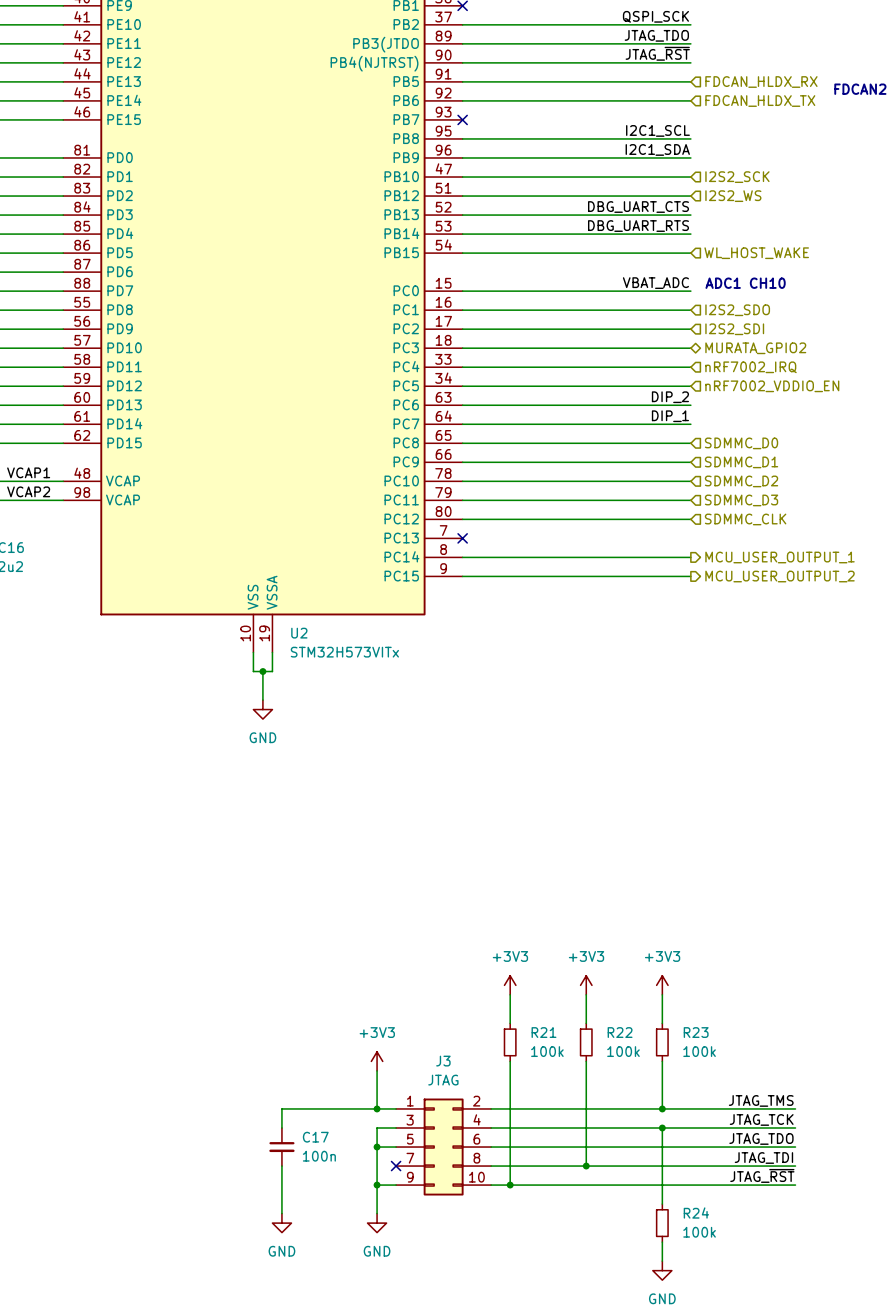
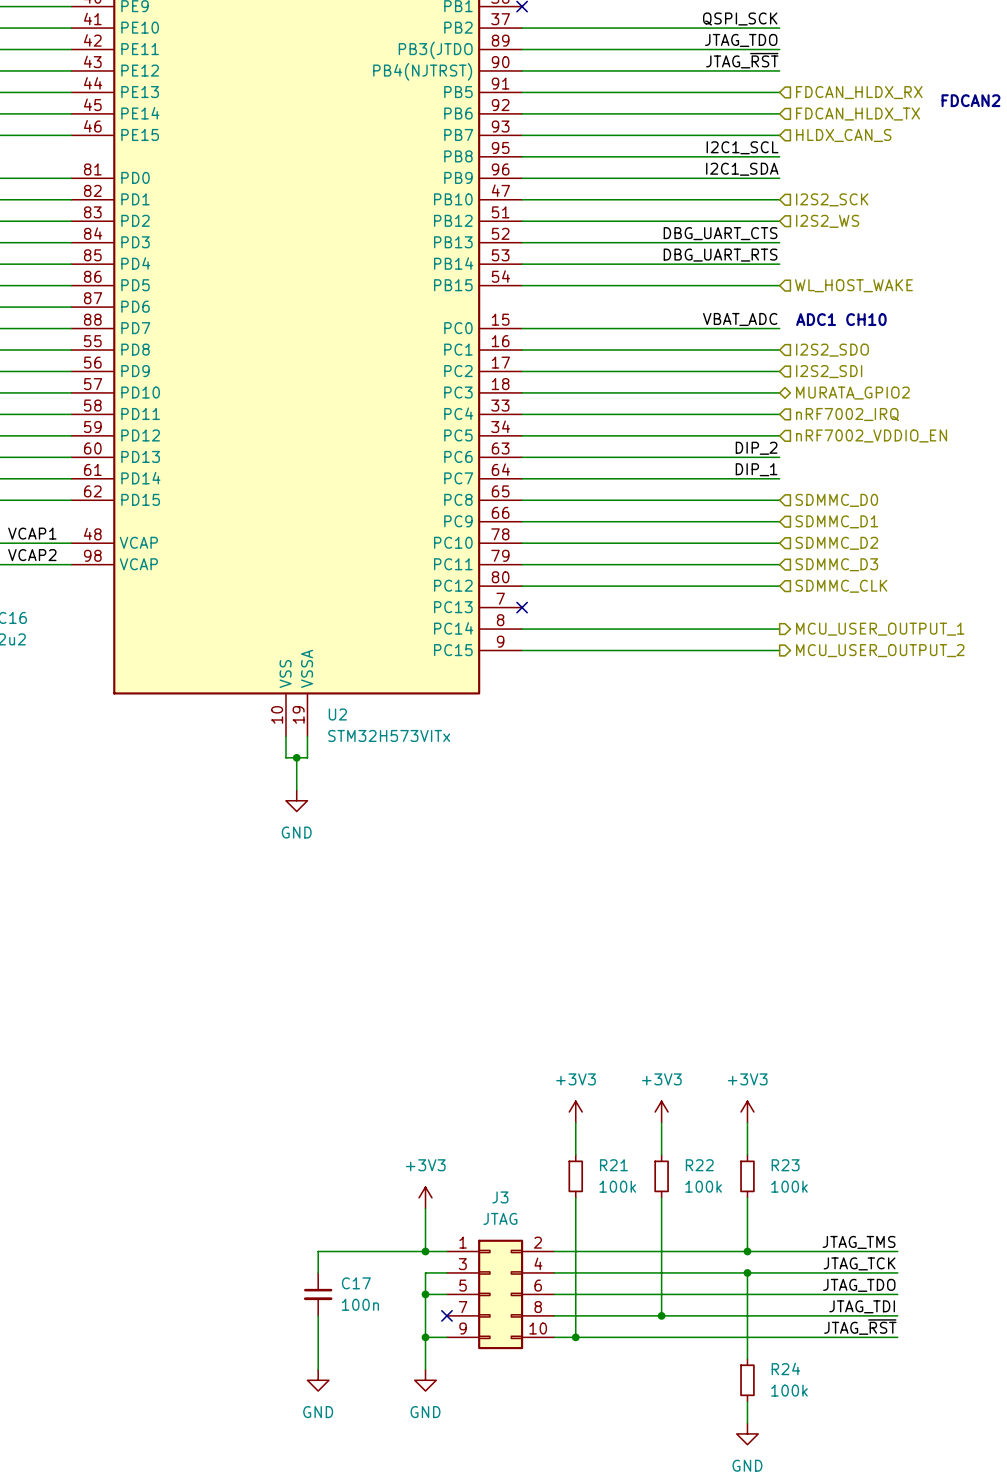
wire: none -> (522, 135) (779, 135)
no-connect mark: (462, 119) -> none
hierarchical label: none -> HLDX_CAN_S (843, 135)

